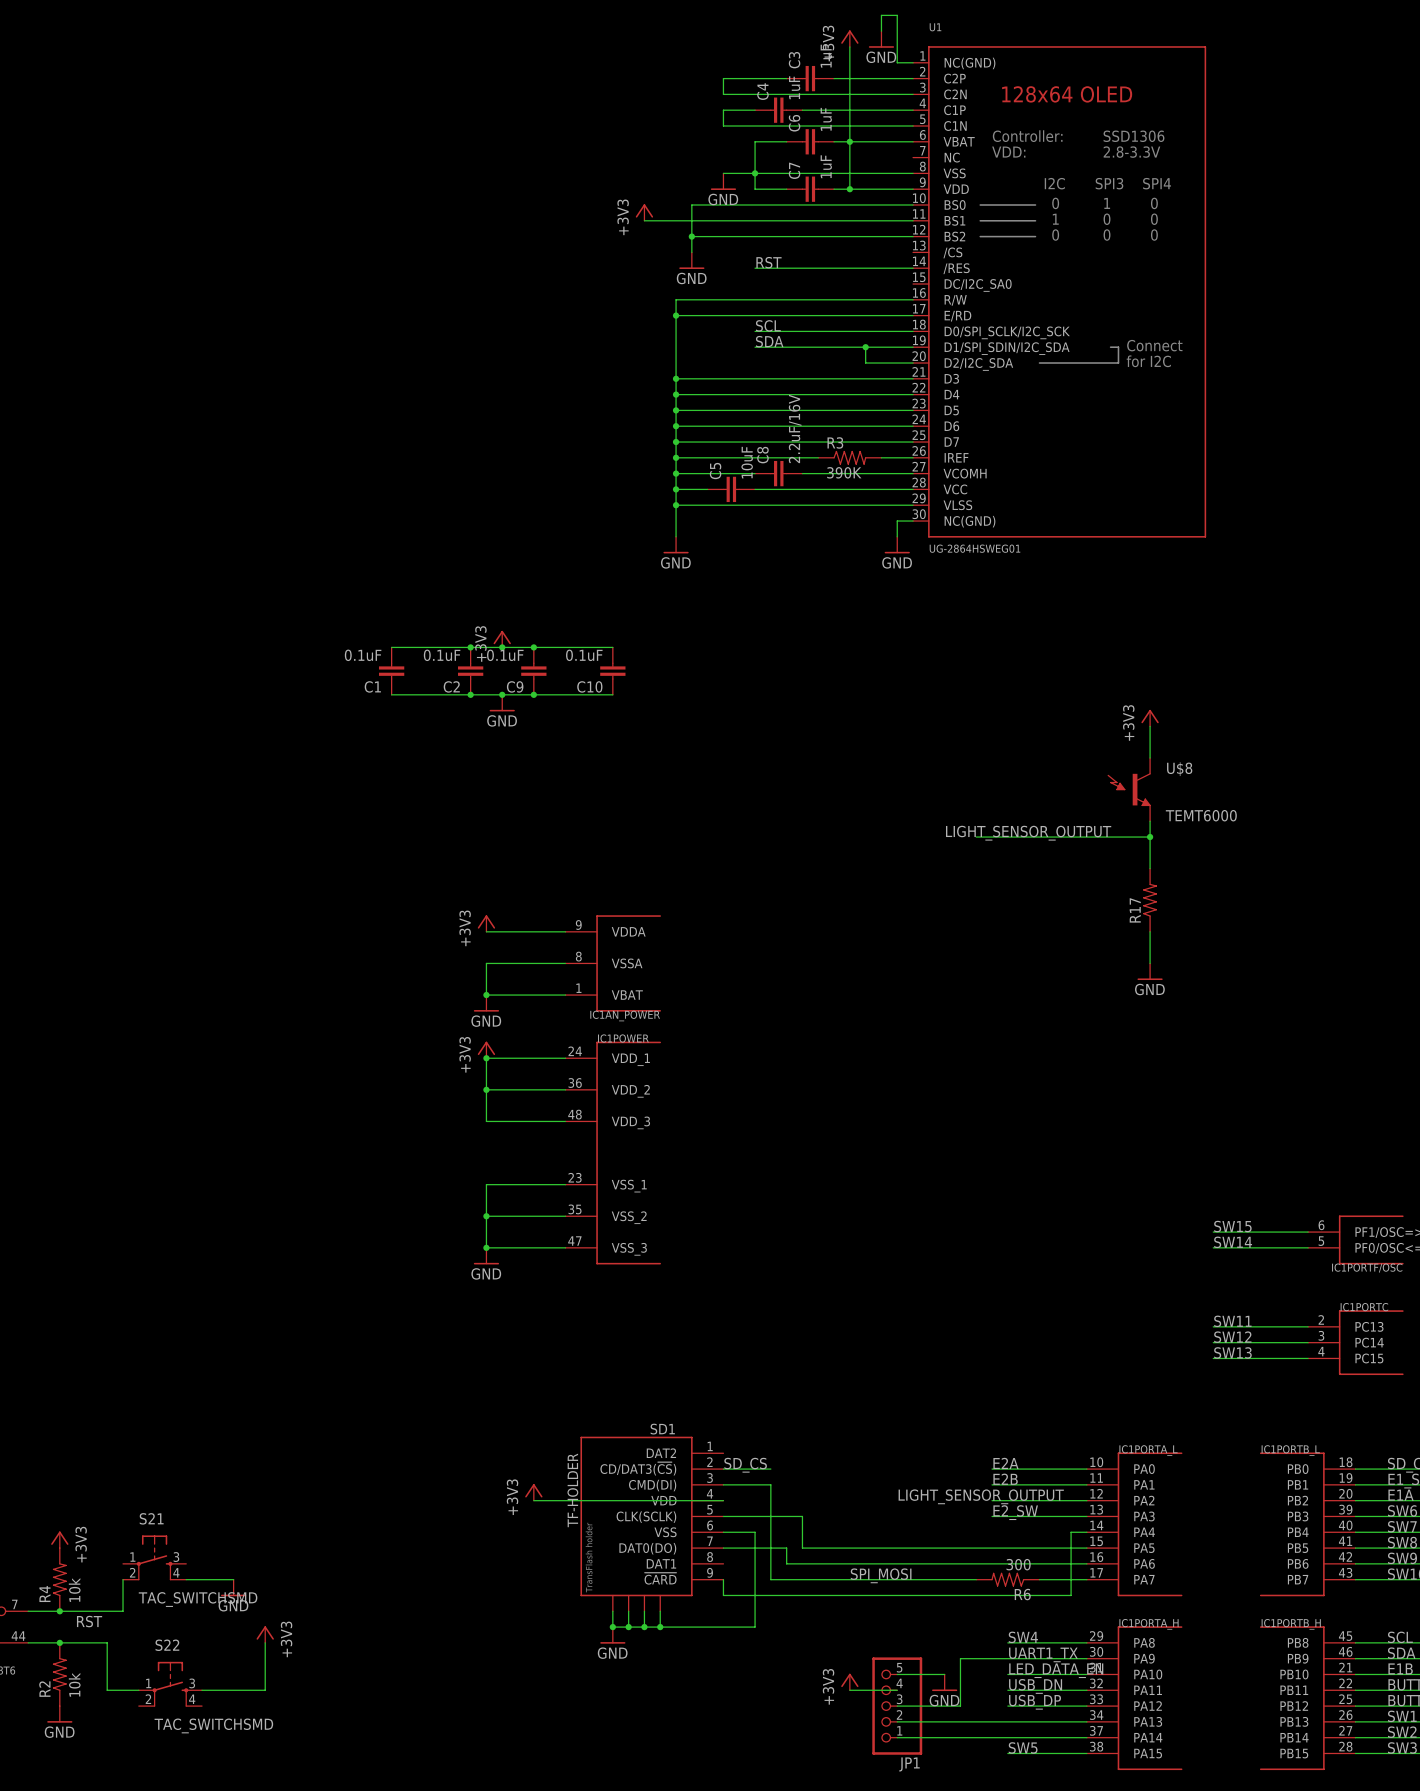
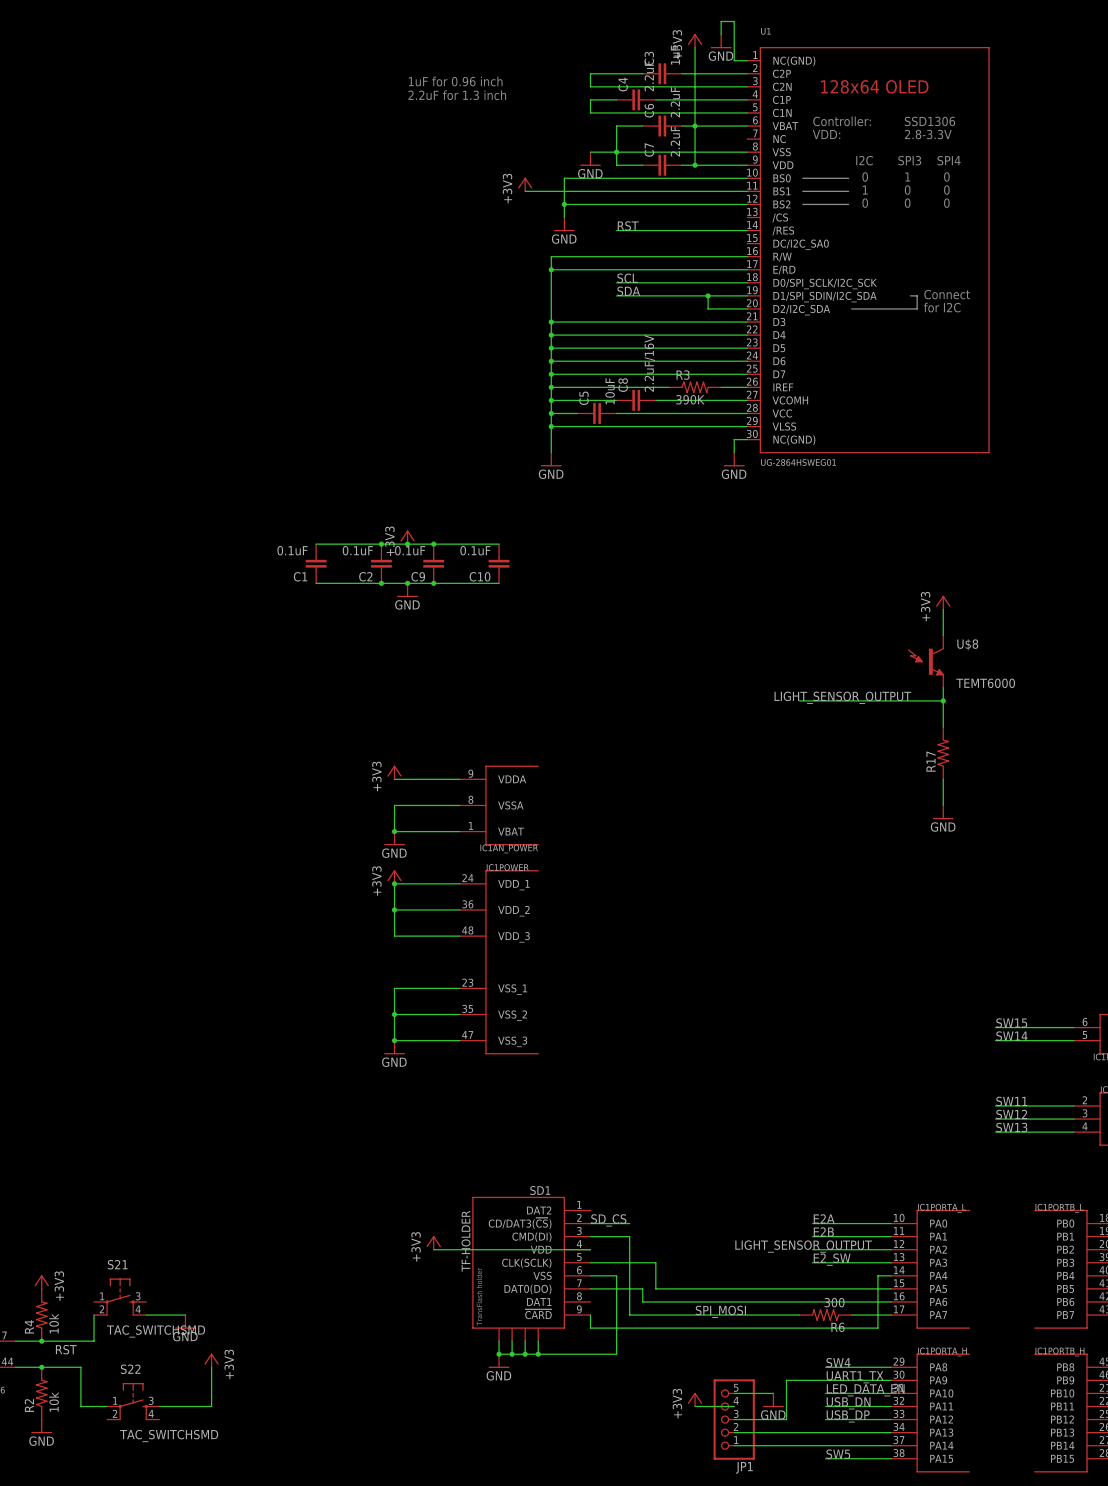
text: none -> 1uF for 0.96 inch (455, 81)
C4 value: 1uF (794, 87) -> 2.2uF (649, 76)
text: none -> 2.2uF for 1.3 inch (457, 95)
C6 value: 1uF (826, 119) -> 2.2uF (675, 102)
C7 value: 1uF (826, 166) -> 2.2uF (675, 141)

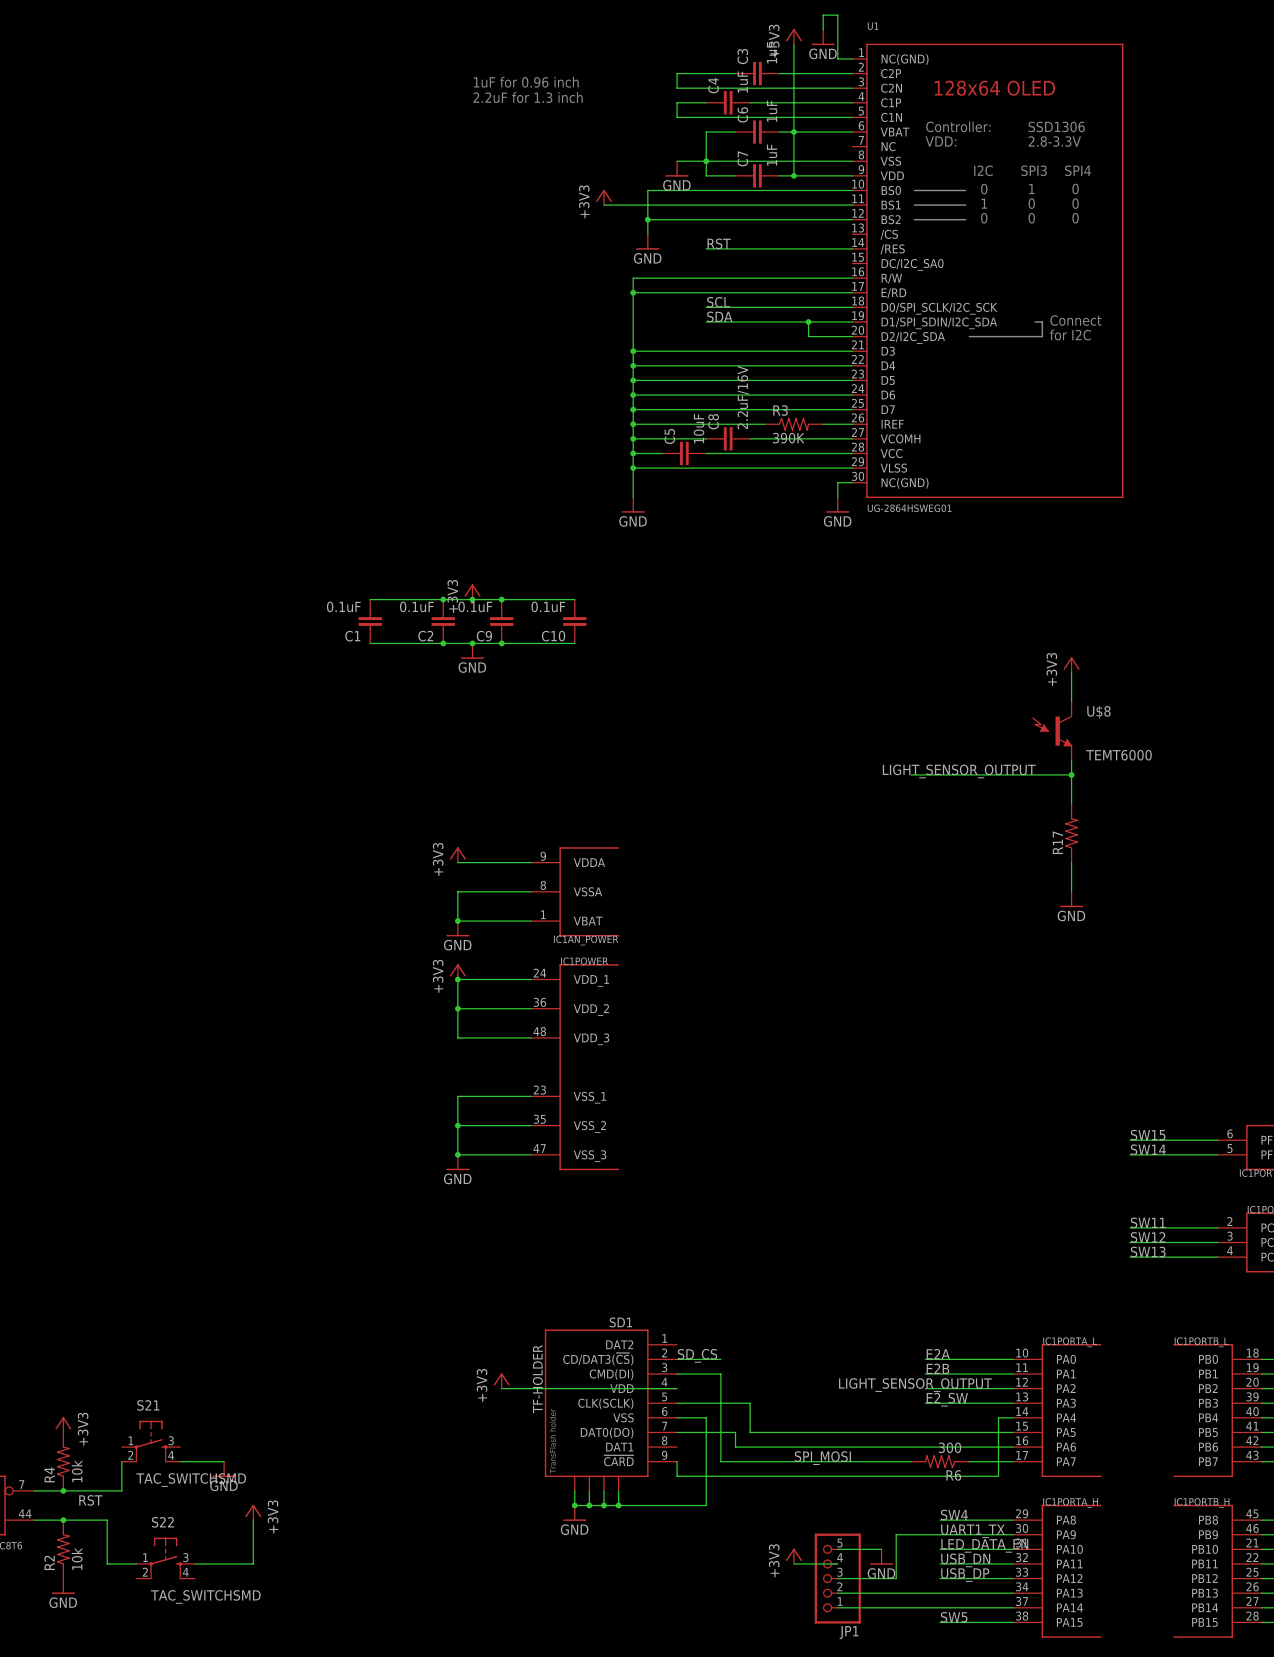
C4 value: 2.2uF (649, 76) -> 1uF (742, 82)
C6 value: 2.2uF (675, 102) -> 1uF (772, 111)
C7 value: 2.2uF (675, 141) -> 1uF (772, 155)

